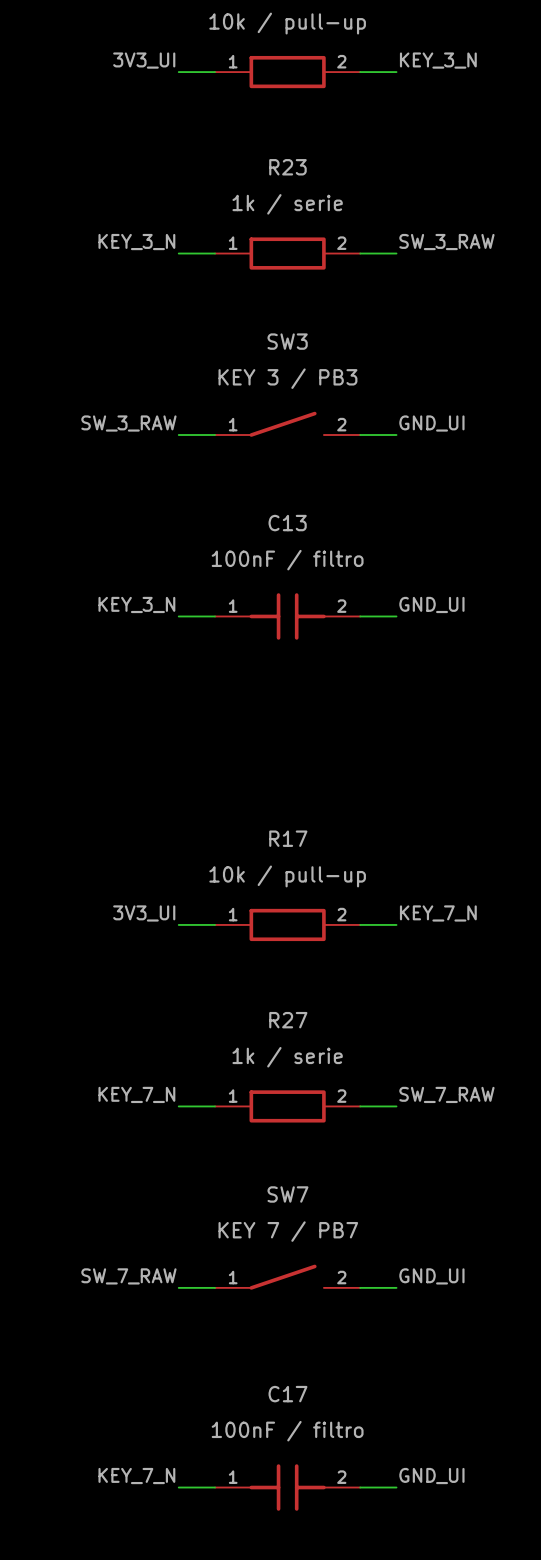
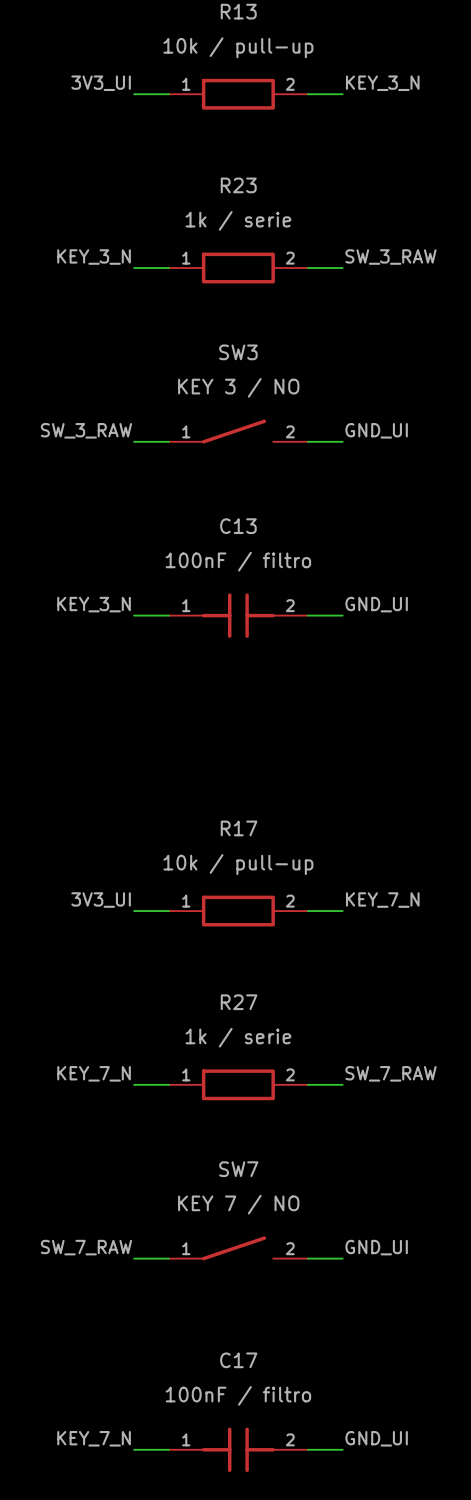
SW3 value: KEY 3 / PB3 (287, 378) -> KEY 3 / NO (238, 387)
SW7 value: KEY 7 / PB7 (288, 1231) -> KEY 7 / NO (238, 1204)

